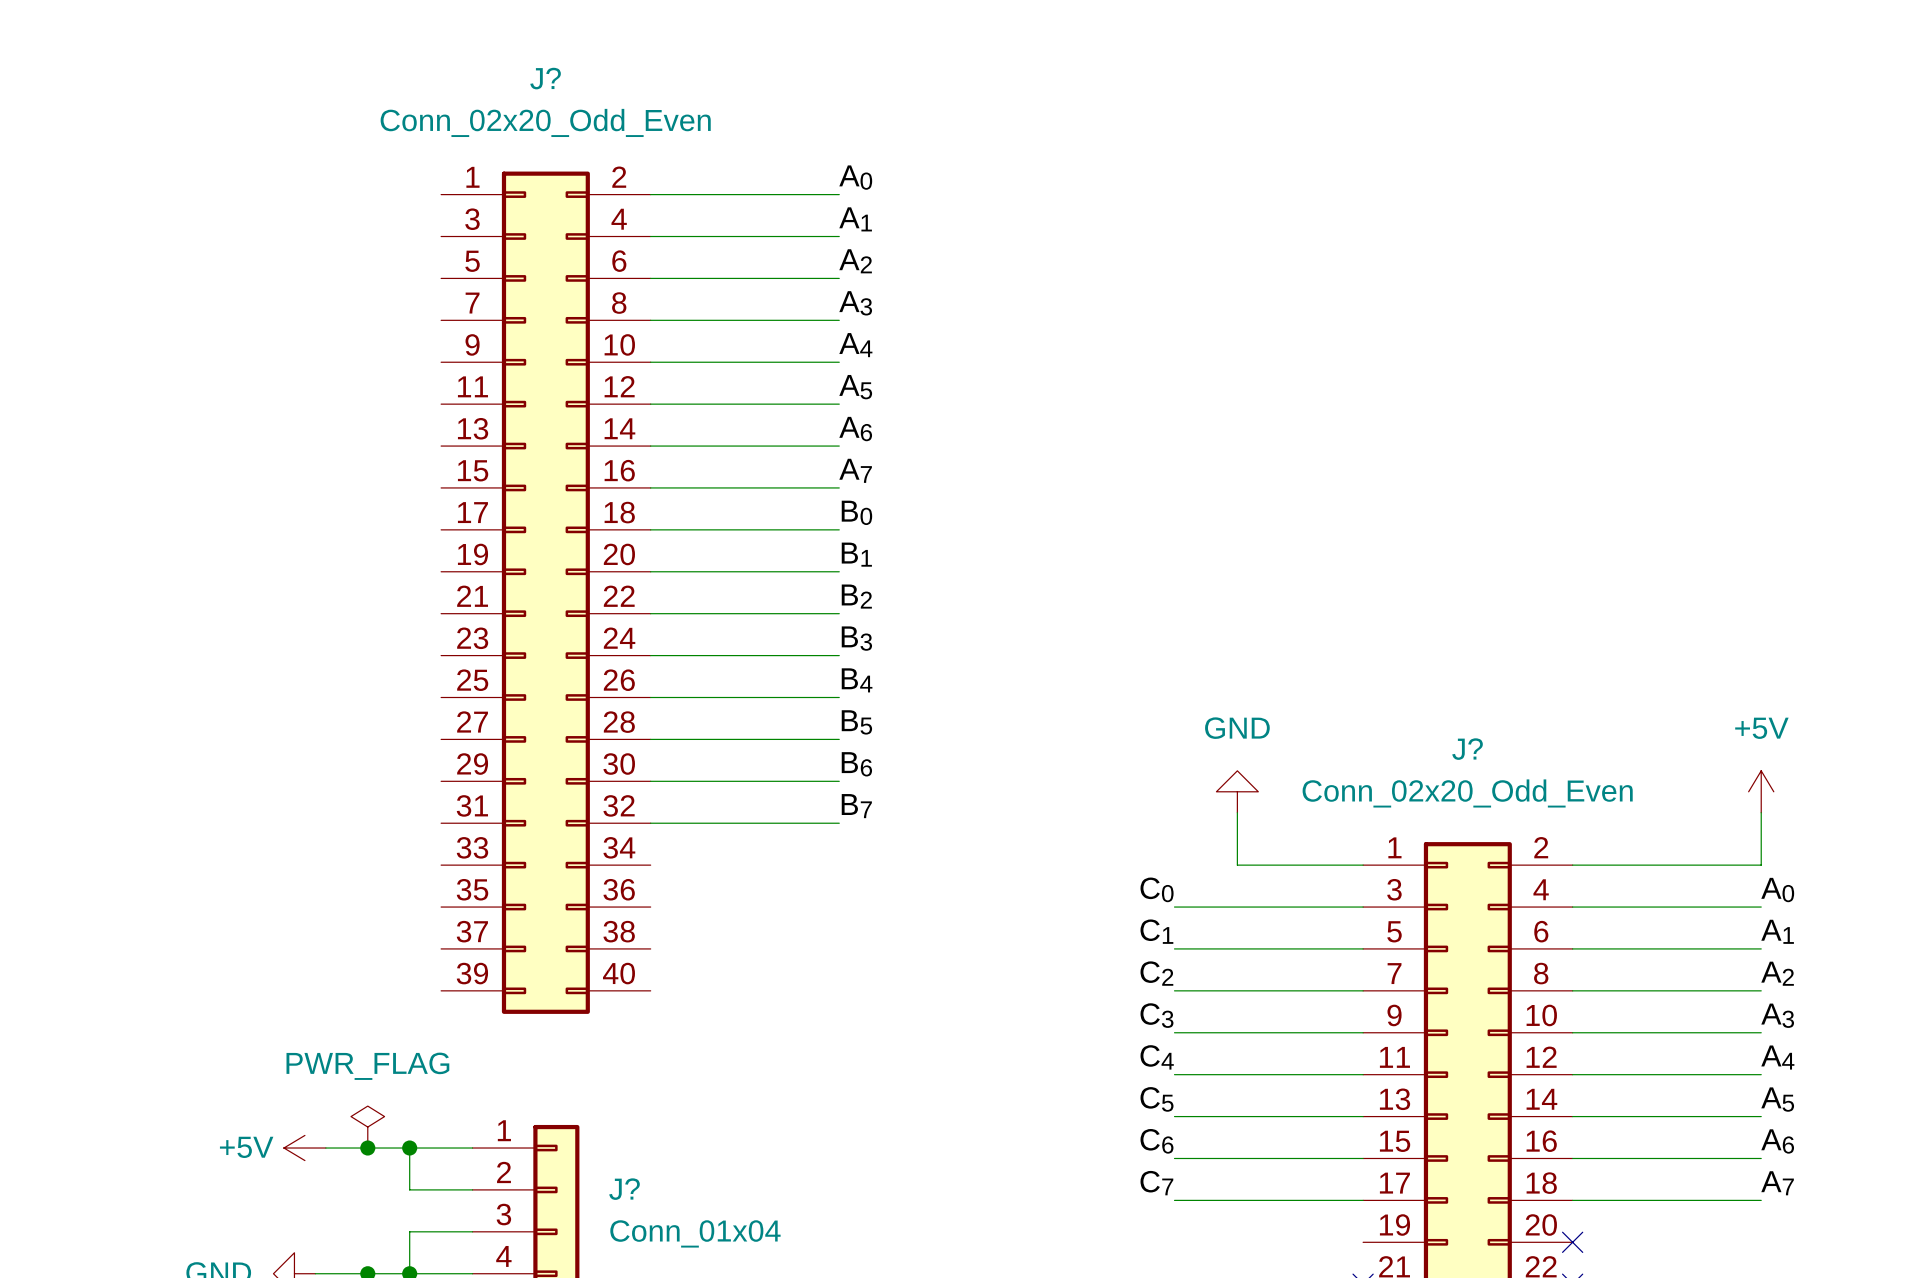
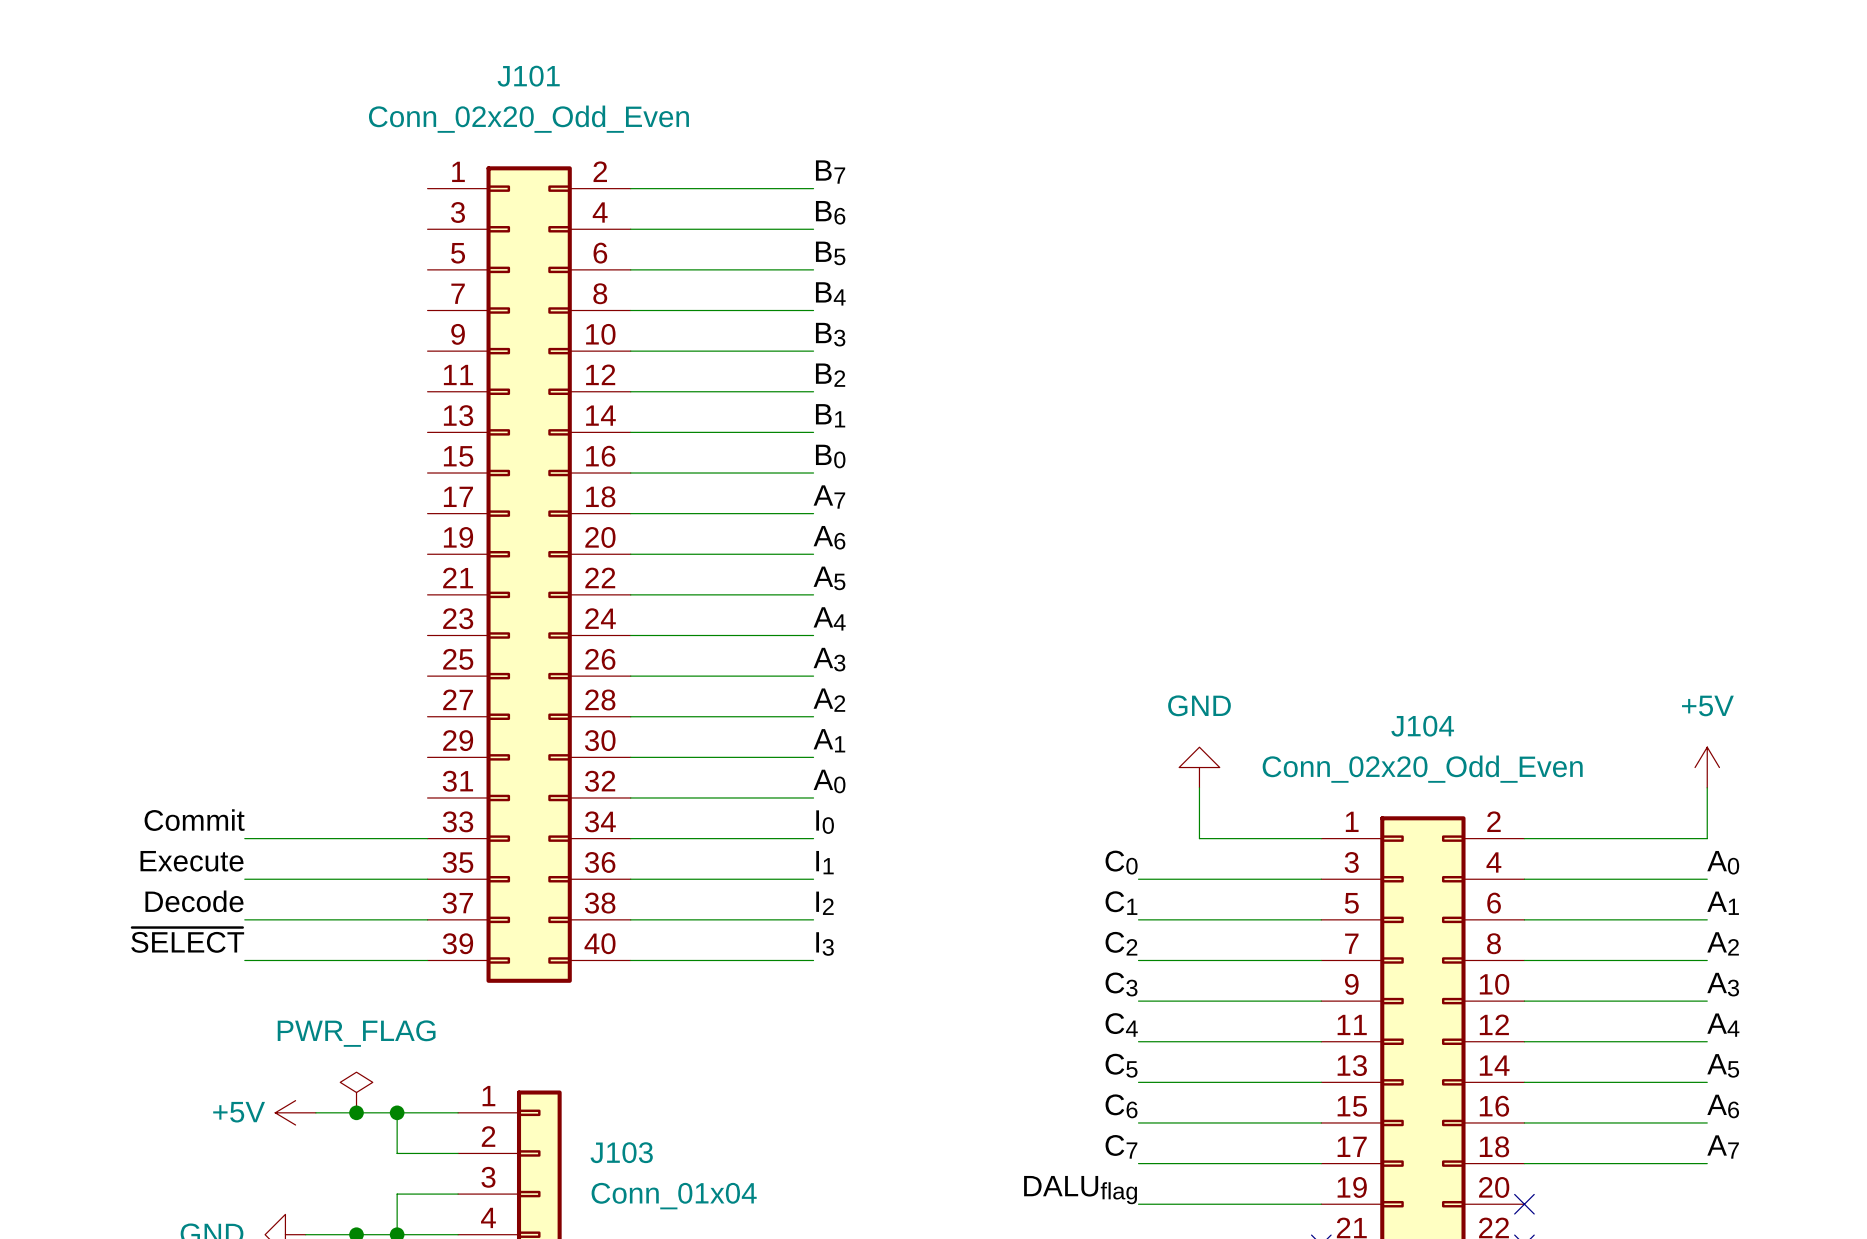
J? name: J? (545, 78) -> J101 (528, 76)
label: A0 (855, 177) -> B7 (830, 172)
label: A1 (855, 219) -> B6 (830, 212)
label: A2 (855, 261) -> B5 (830, 253)
label: A3 (855, 303) -> B4 (830, 293)
label: A4 (855, 345) -> B3 (830, 334)
label: A5 (855, 387) -> B2 (830, 375)
label: A6 (855, 429) -> B1 (830, 415)
label: A7 (855, 470) -> B0 (830, 456)
label: B0 (856, 512) -> A7 (829, 497)
label: B1 (856, 554) -> A6 (829, 537)
label: B2 (856, 596) -> A5 (829, 578)
label: B3 (856, 638) -> A4 (829, 618)
label: B4 (857, 680) -> A3 (829, 659)
label: B5 (856, 722) -> A2 (829, 700)
J? name: J? (1467, 749) -> J104 (1422, 726)
label: B6 (856, 764) -> A1 (829, 740)
label: B7 (856, 806) -> A0 (829, 781)
label: none -> Commit (194, 820)
label: none -> I0 (825, 822)
wire: none -> (244, 838) (427, 838)
wire: none -> (630, 838) (813, 838)
label: none -> Execute (192, 861)
label: none -> I1 (824, 862)
wire: none -> (244, 879) (427, 879)
wire: none -> (630, 879) (813, 879)
label: none -> Decode (194, 901)
label: none -> I2 (824, 903)
wire: none -> (244, 919) (427, 919)
wire: none -> (630, 919) (813, 919)
label: none -> ~{SELECT} (187, 940)
label: none -> I3 (825, 944)
wire: none -> (244, 960) (427, 960)
wire: none -> (630, 960) (813, 960)
J? name: J? (624, 1189) -> J103 (621, 1152)
label: none -> DALUflag (1080, 1190)
wire: none -> (1138, 1204) (1321, 1204)

